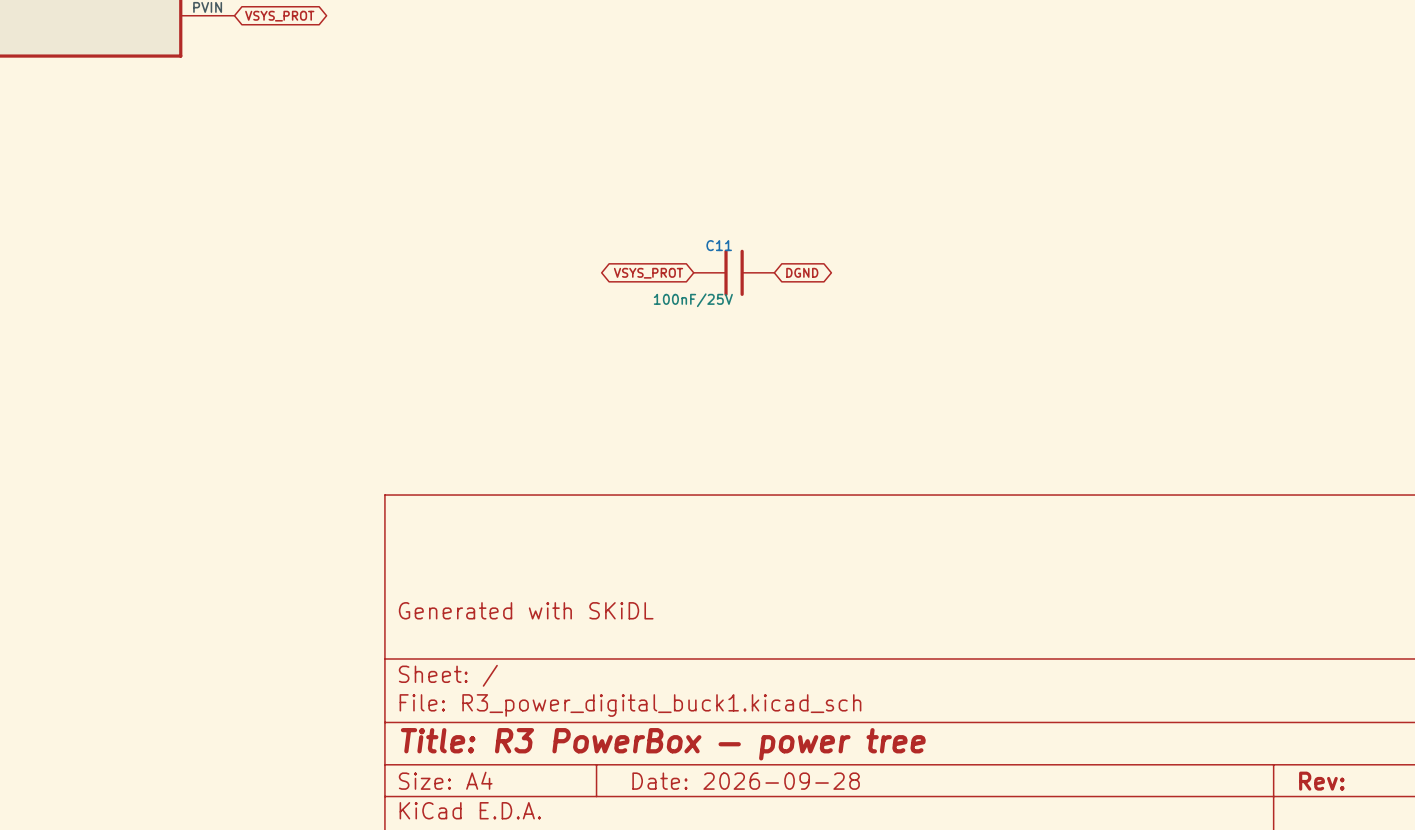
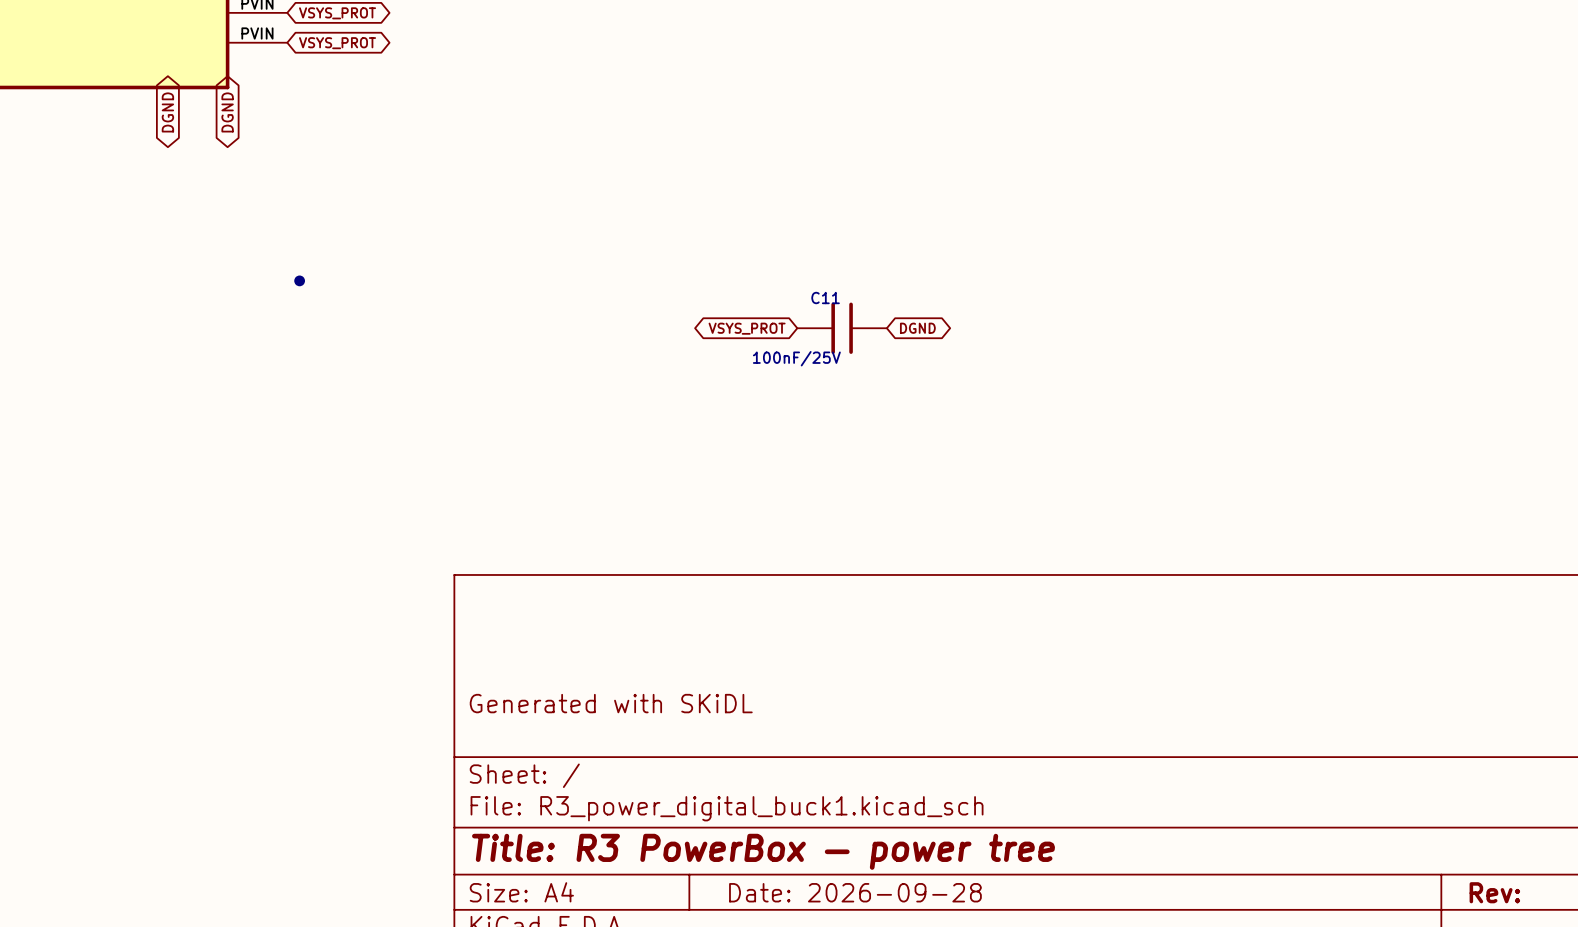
global label: none -> DGND (167, 112)
global label: none -> DGND (227, 112)
junction: none -> (299, 280)

